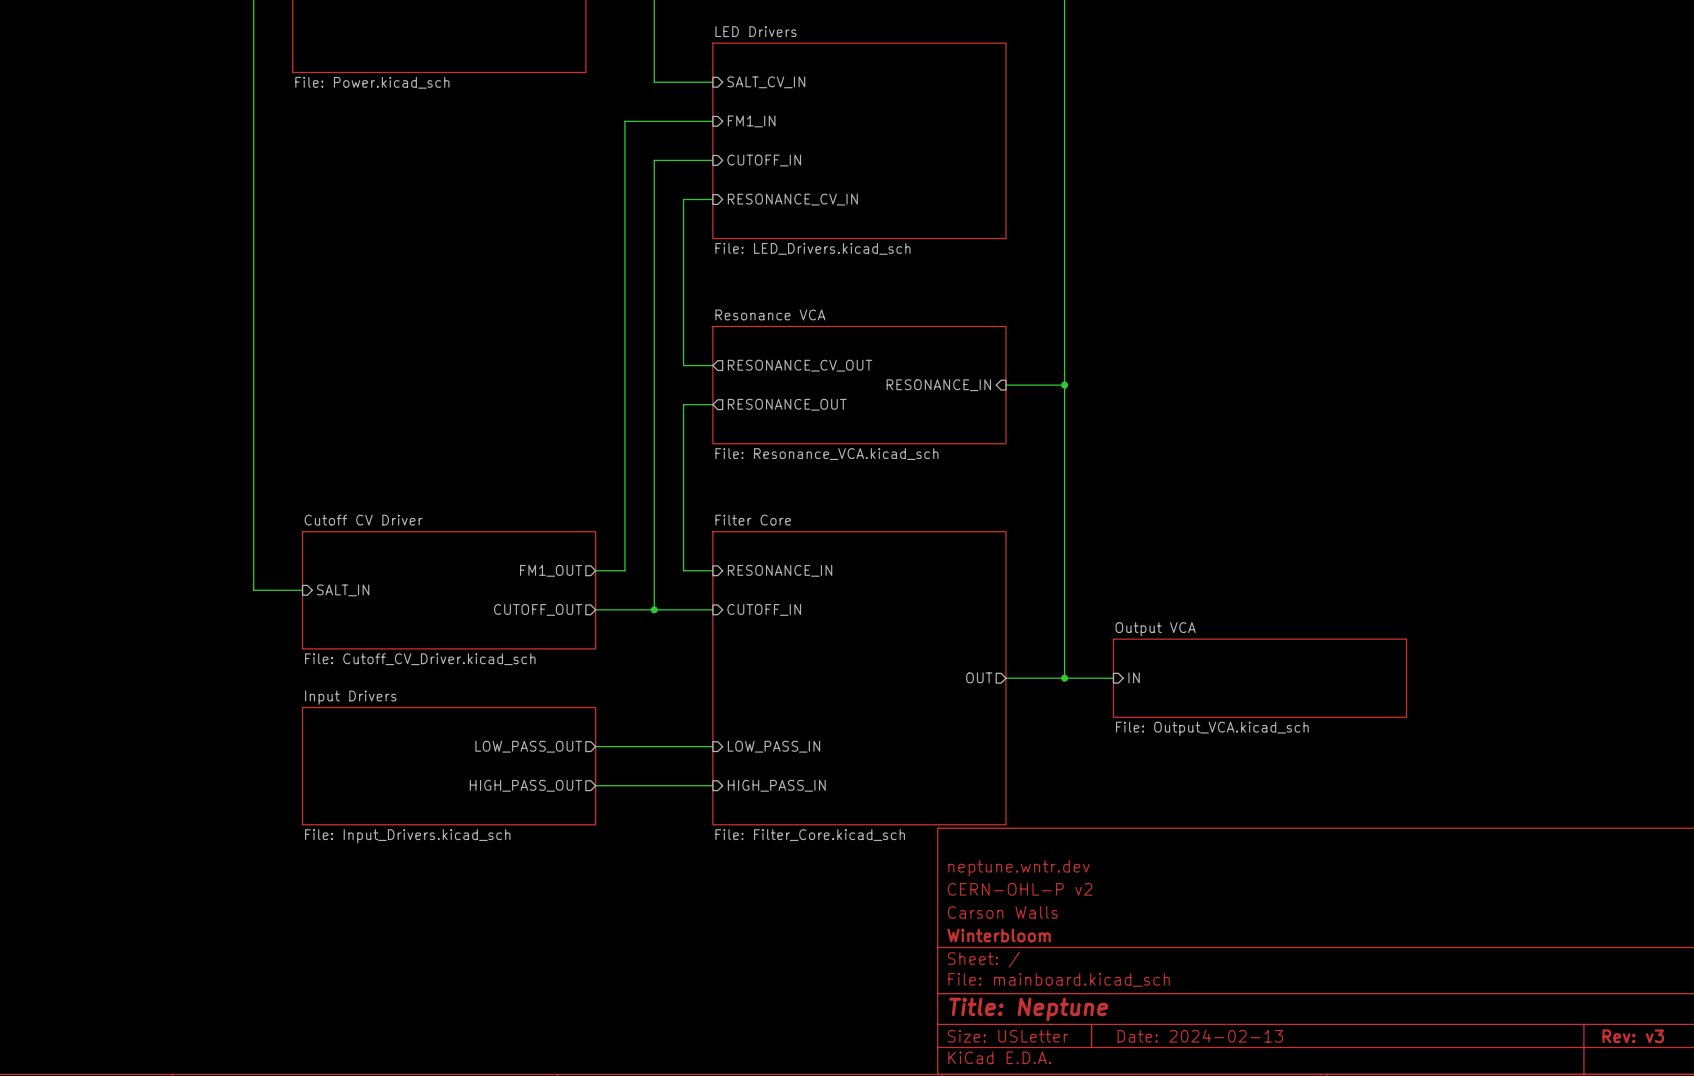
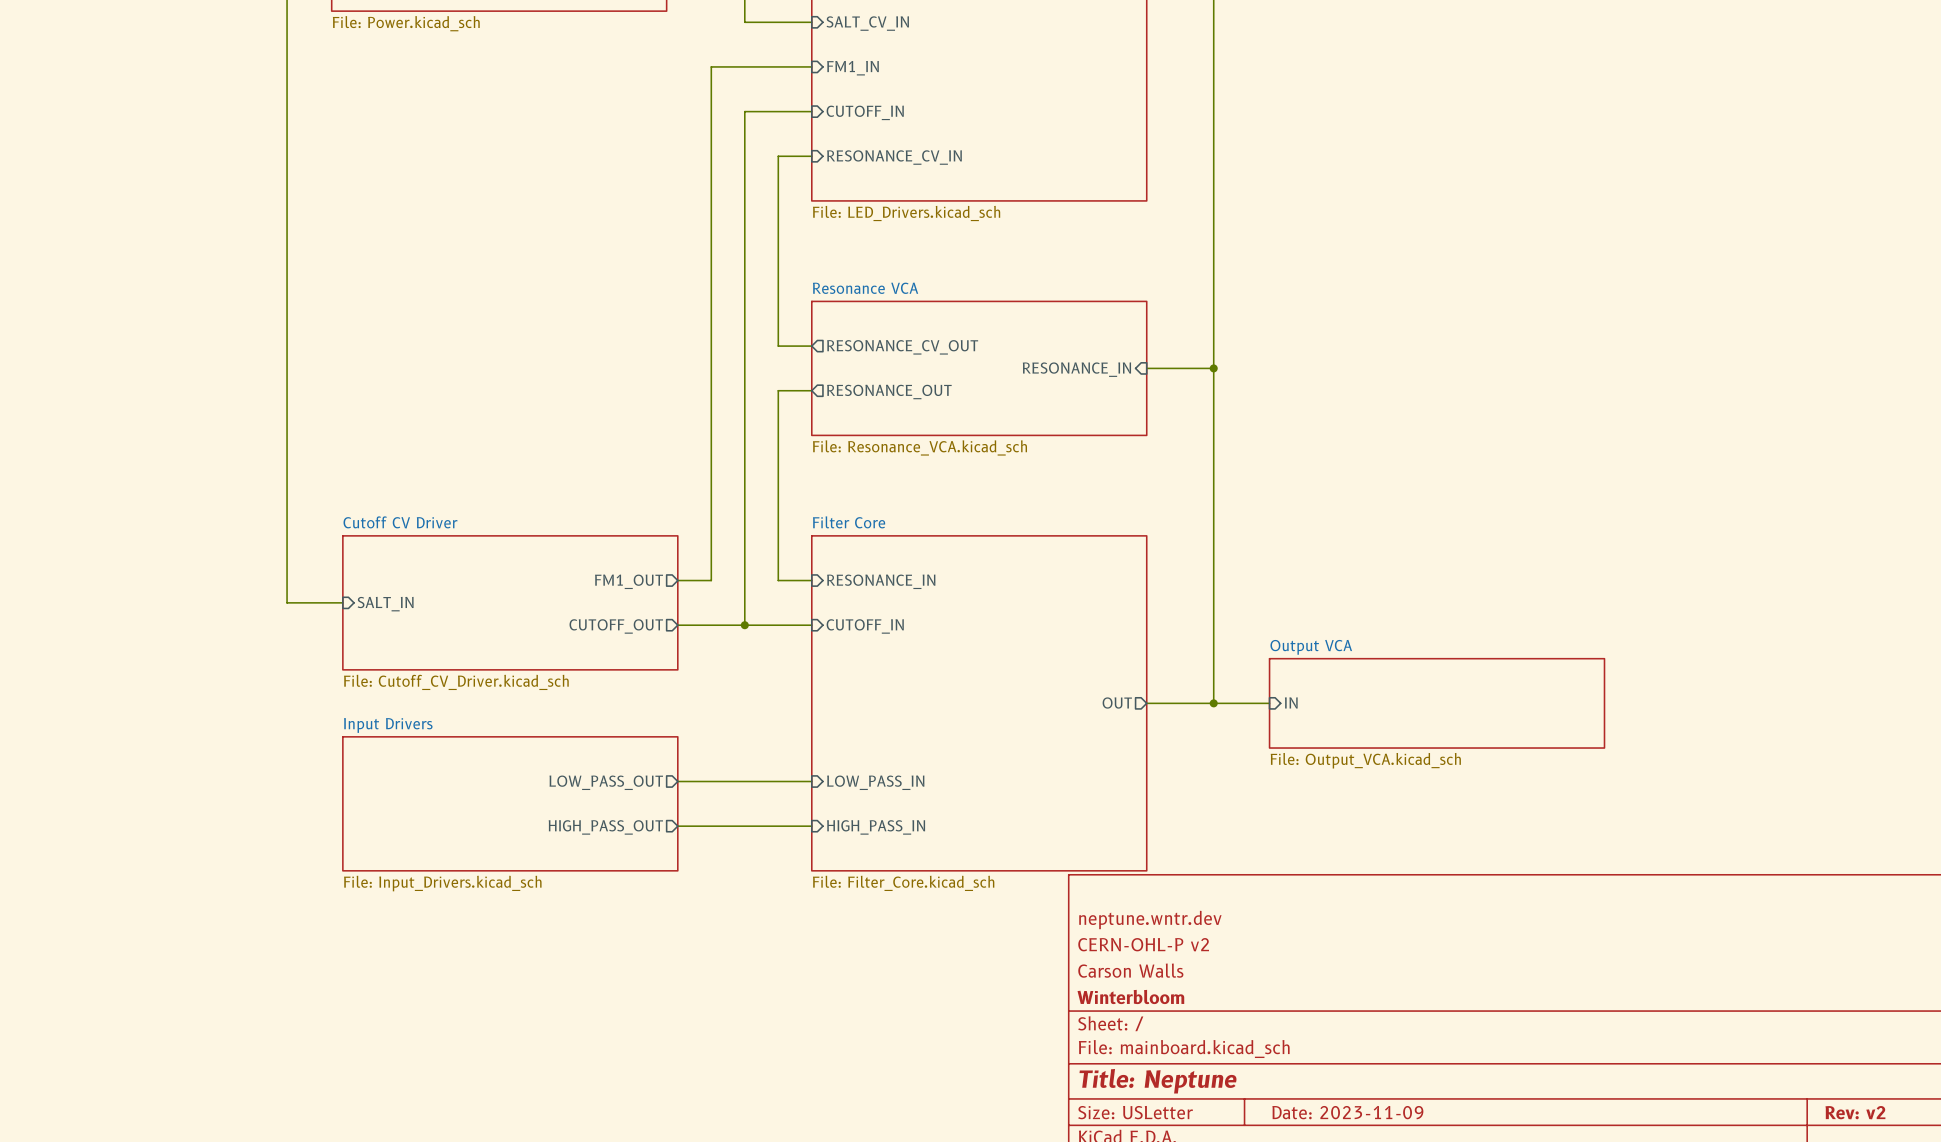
title block: Date: 2024-02-13 (1200, 1036) -> Date: 2023-11-09 (1347, 1112)
title block: Rev: v3 (1633, 1036) -> Rev: v2 (1855, 1112)

